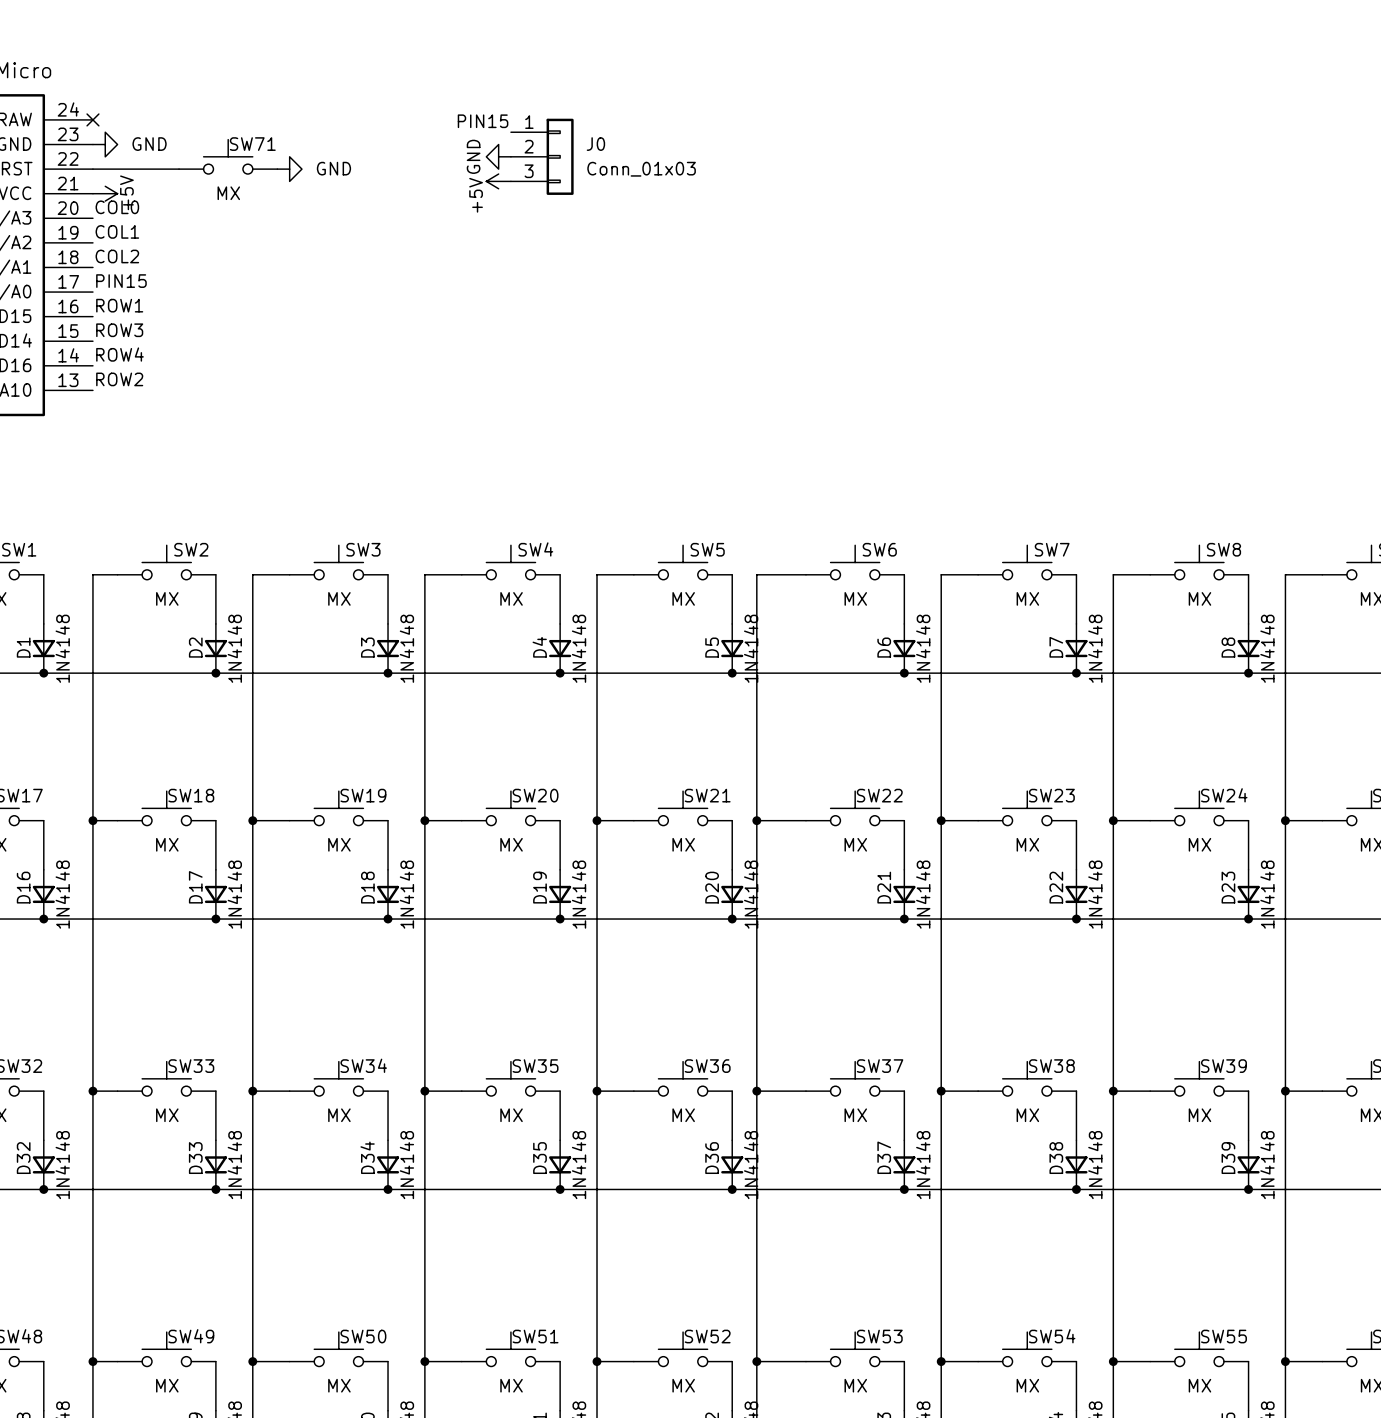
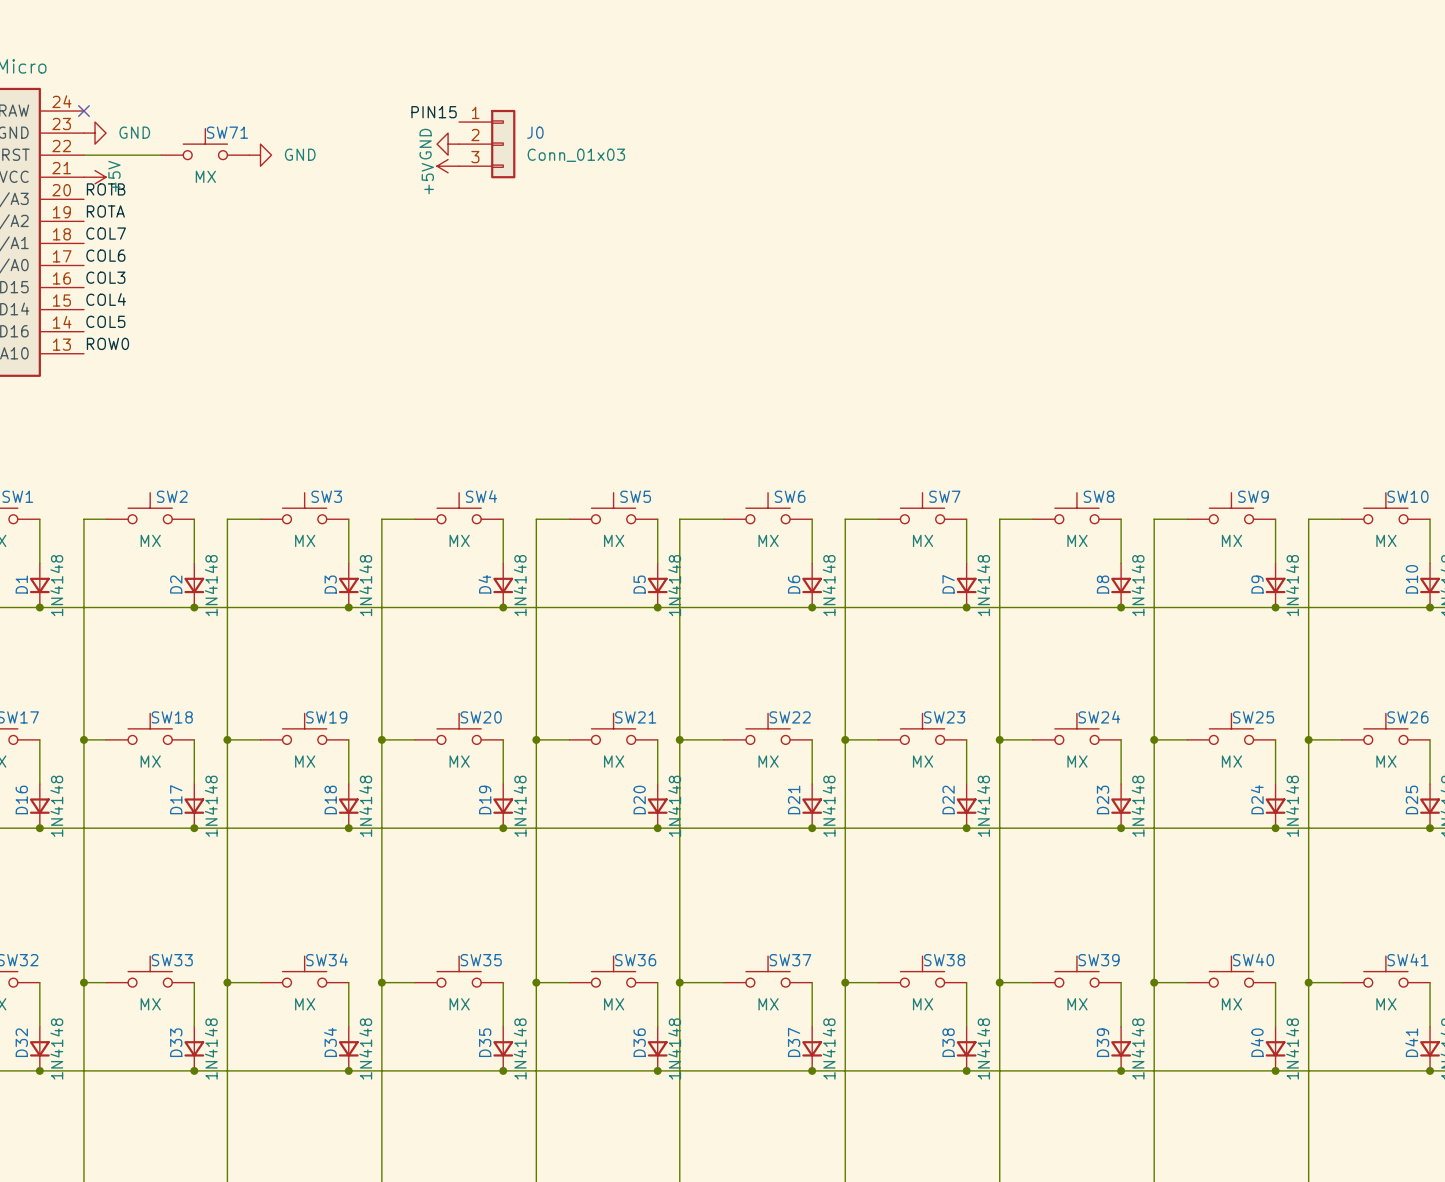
label: COL0 (117, 207) -> ROTB (106, 189)
label: COL1 (117, 231) -> ROTA (105, 211)
label: COL2 (117, 256) -> COL7 (106, 233)
label: PIN15 (121, 281) -> COL6 (105, 255)
label: ROW1 (119, 305) -> COL3 (105, 277)
label: ROW3 (119, 330) -> COL4 (106, 299)
label: ROW4 (119, 354) -> COL5 (105, 321)
label: ROW2 (119, 379) -> ROW0 (107, 343)

